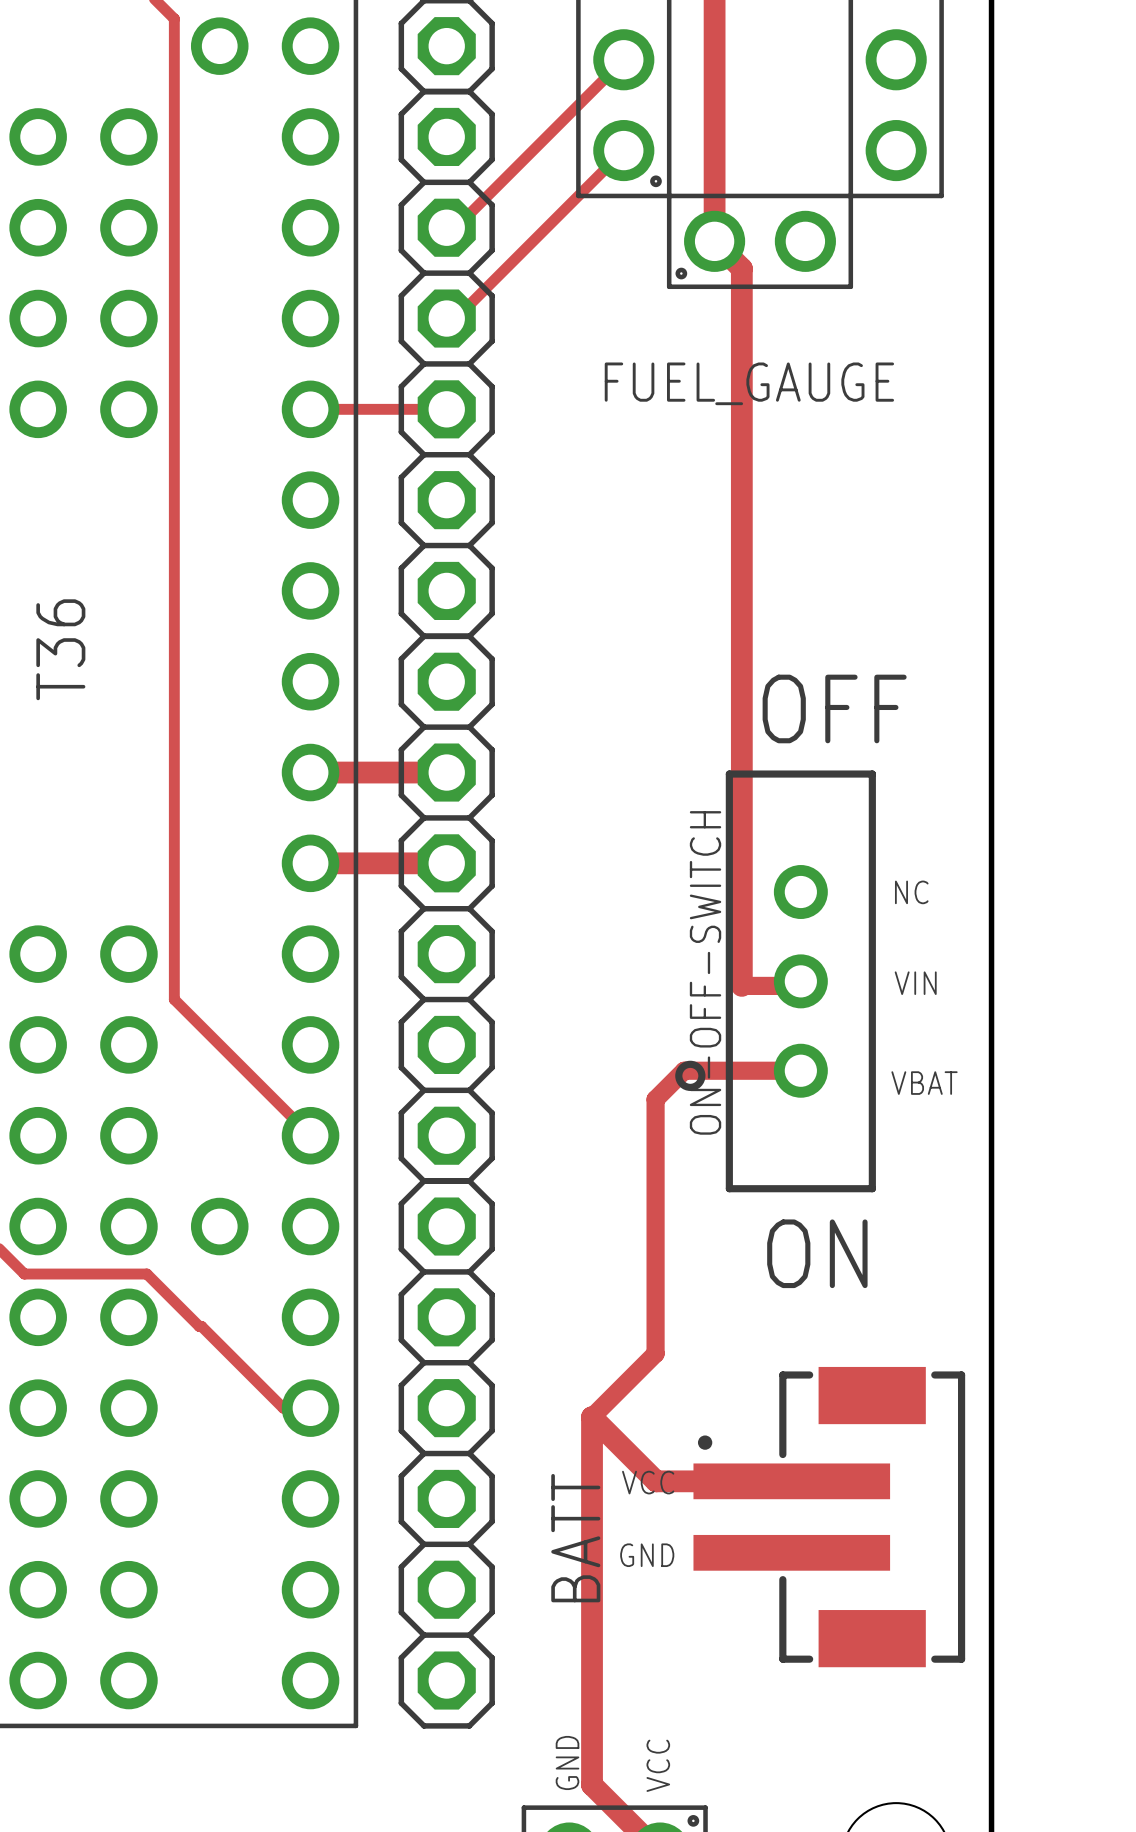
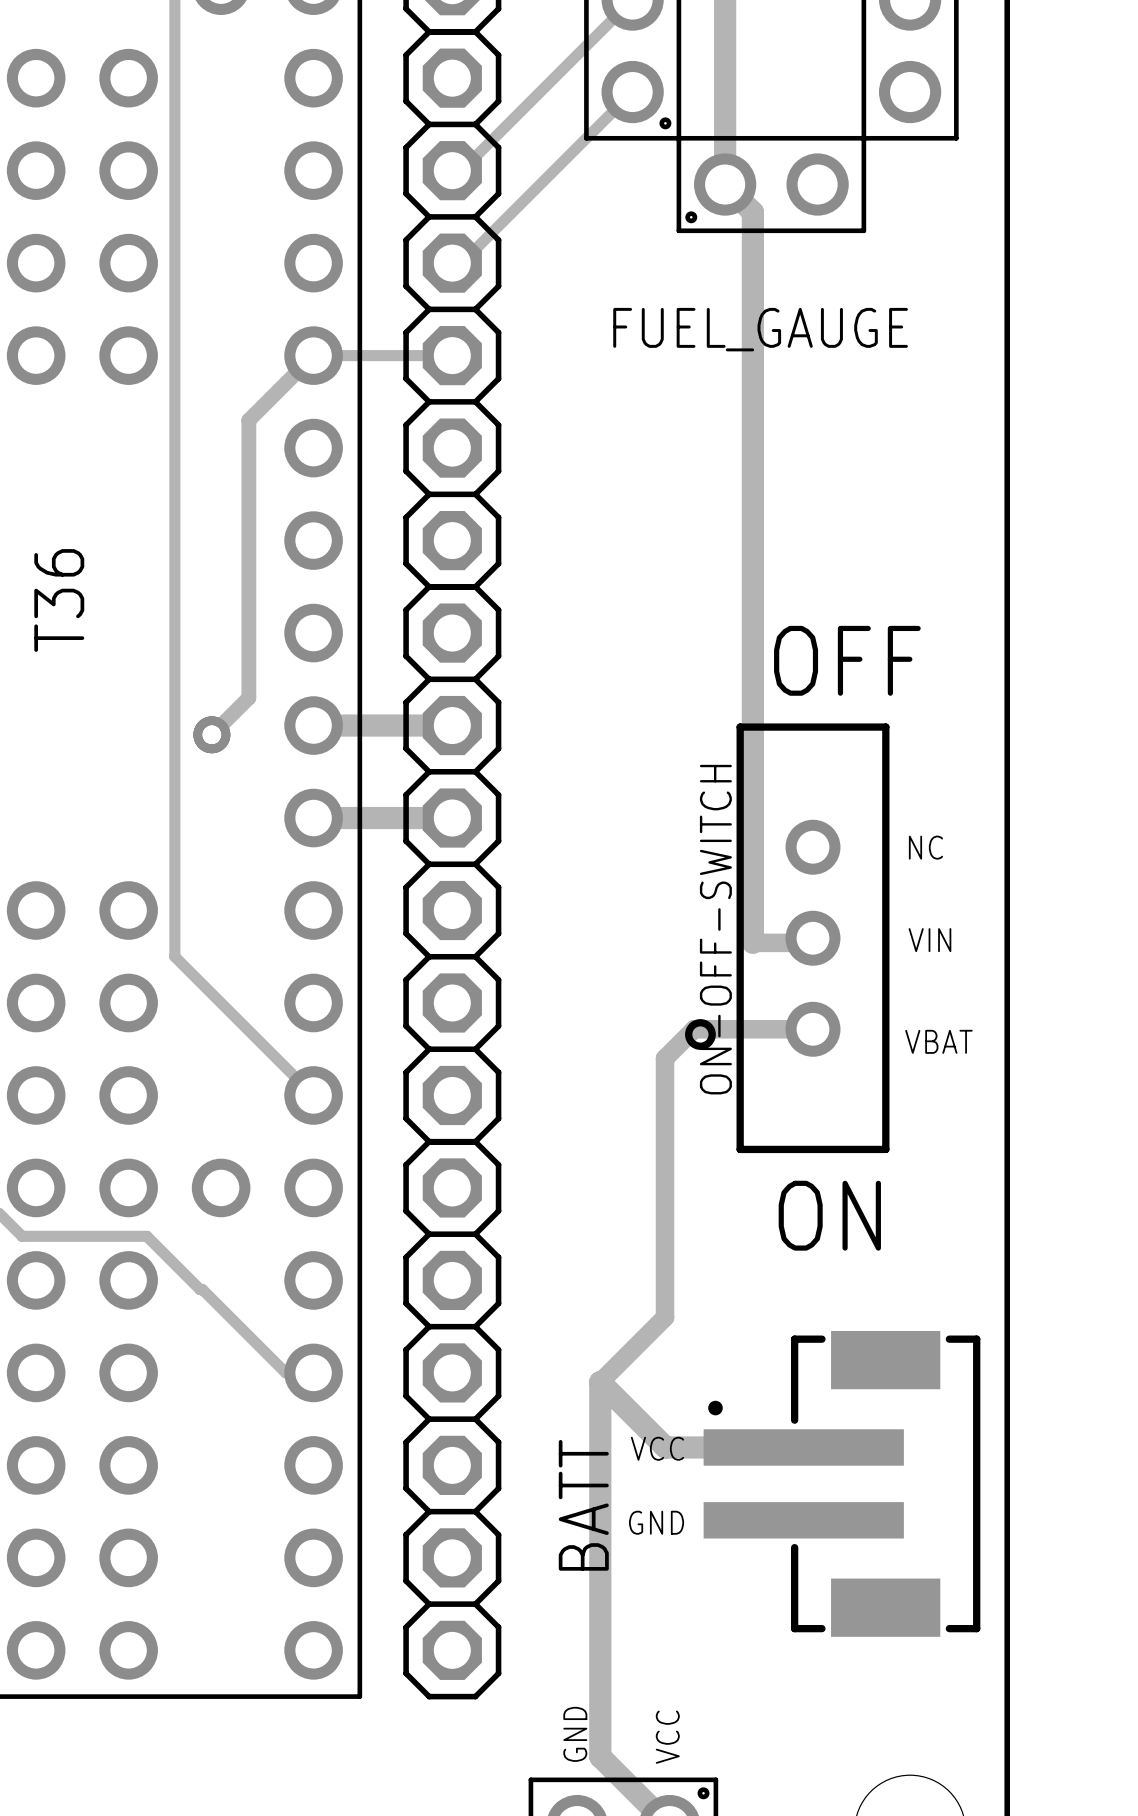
track: none -> (313, 355) (248, 420) (248, 697) (211, 734)
via: none -> (211, 734)

